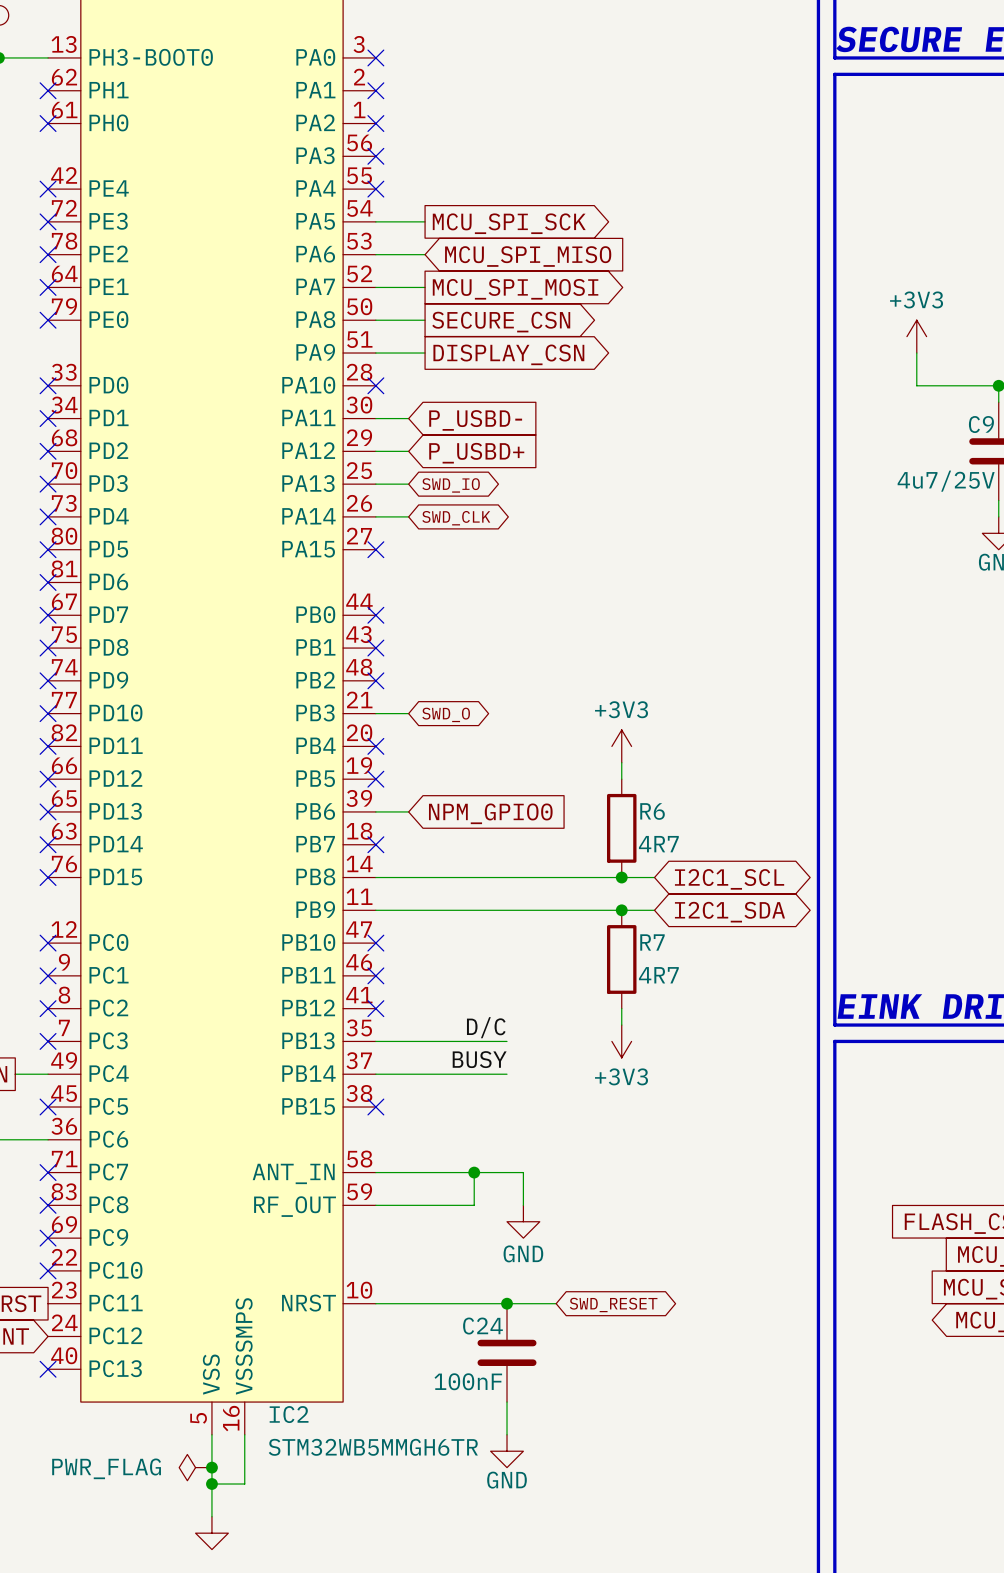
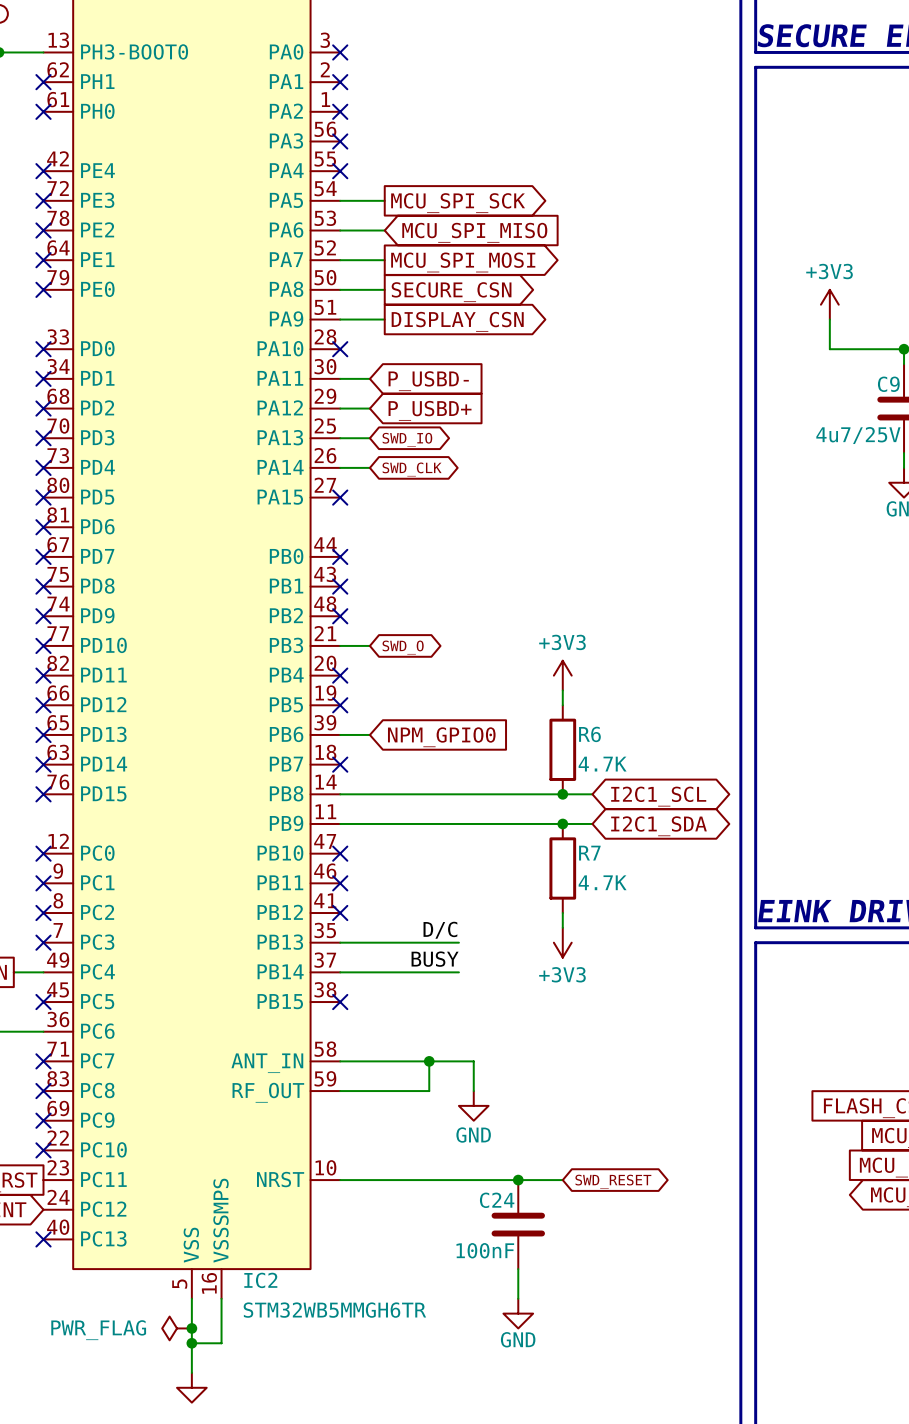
R6 value: 4R7 (658, 844) -> 4.7K (602, 764)
R7 value: 4R7 (658, 975) -> 4.7K (602, 882)
junction position: (507, 1303) -> (518, 1180)
wire: none -> (503, 1180) (562, 1180)
global label position: SWD_RESET (613, 1304) -> SWD_RESET (613, 1181)
C24 position: (507, 1352) -> (518, 1224)
wire: (507, 1402) (507, 1434) -> (518, 1269) (518, 1298)
power symbol position: GND (507, 1451) -> GND (518, 1313)

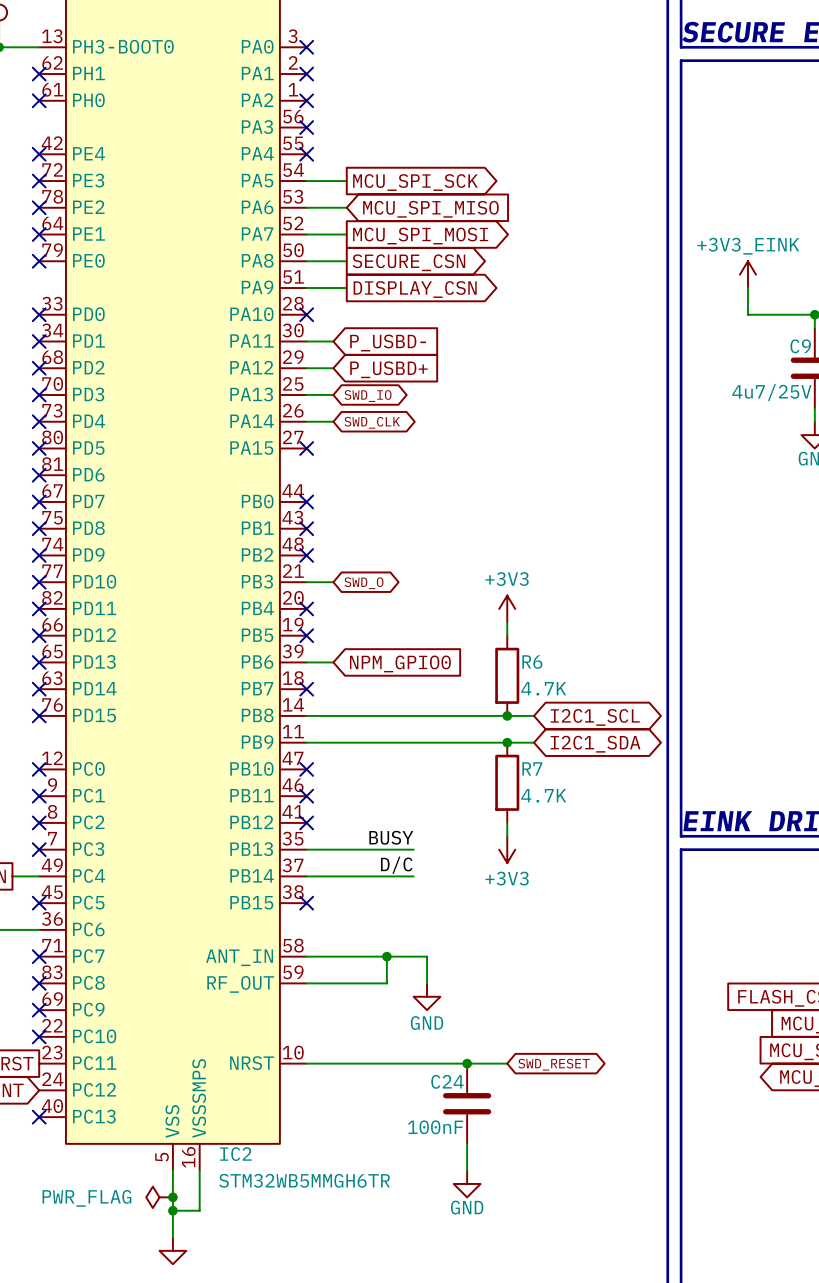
power symbol: +3V3 (829, 304) -> +3V3_EINK (747, 274)
label: D/C (440, 930) -> BUSY (391, 837)
label: BUSY (435, 959) -> D/C (396, 865)

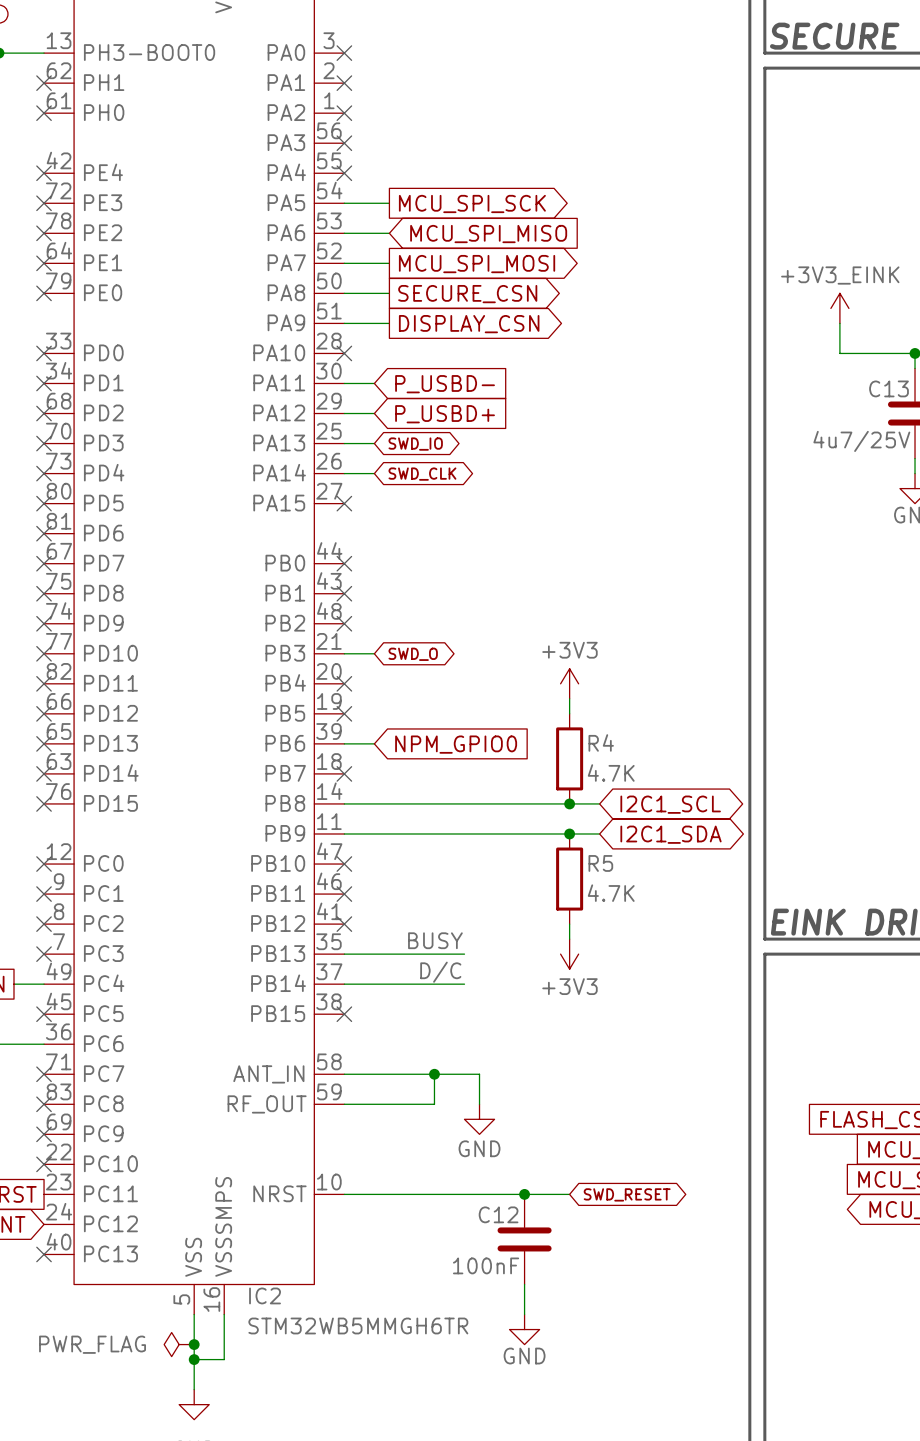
C9 name: C9 (800, 346) -> C13 (889, 388)
R6 name: R6 (532, 662) -> R4 (601, 742)
R7 name: R7 (532, 768) -> R5 (600, 863)
C24 name: C24 (447, 1081) -> C12 (498, 1214)

